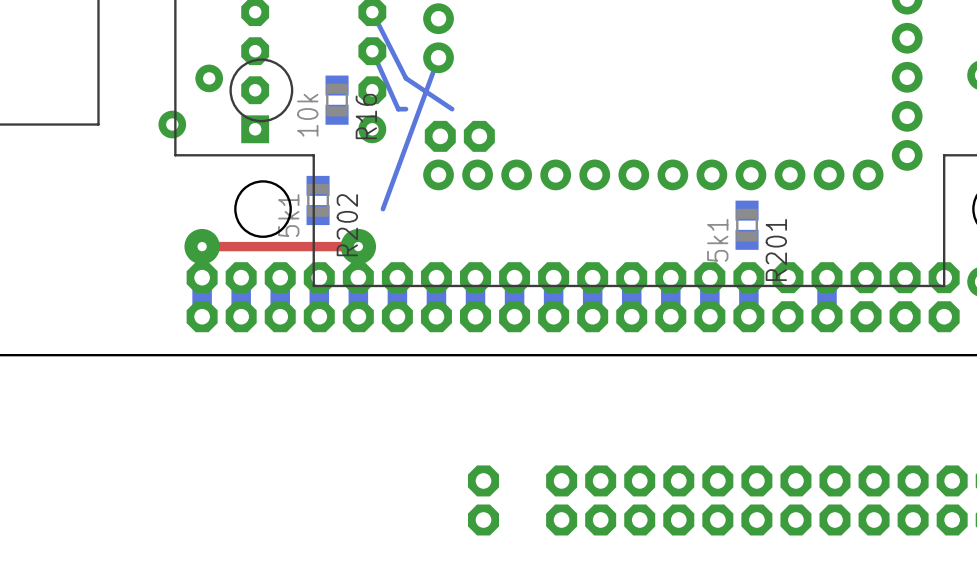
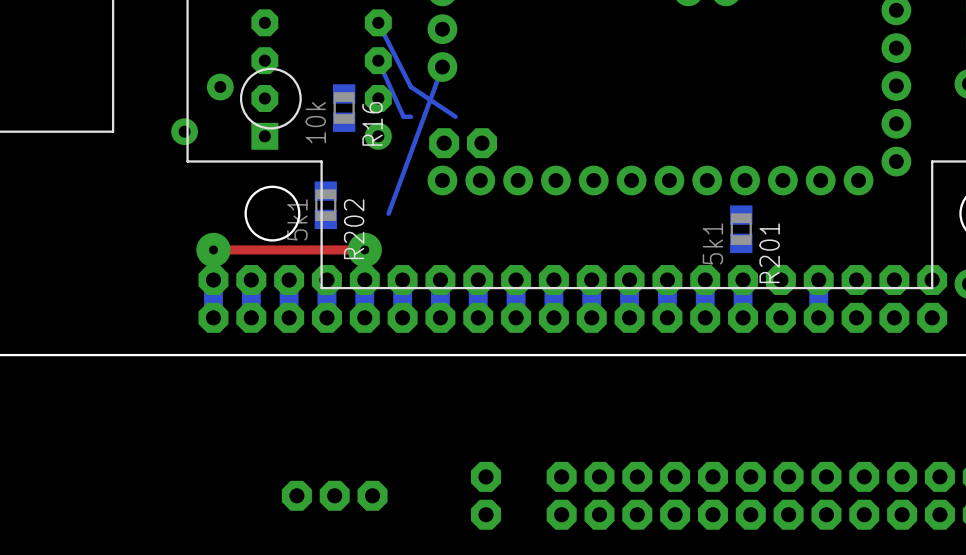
part: none -> (296, 495)
part: none -> (334, 495)
part: none -> (372, 495)

